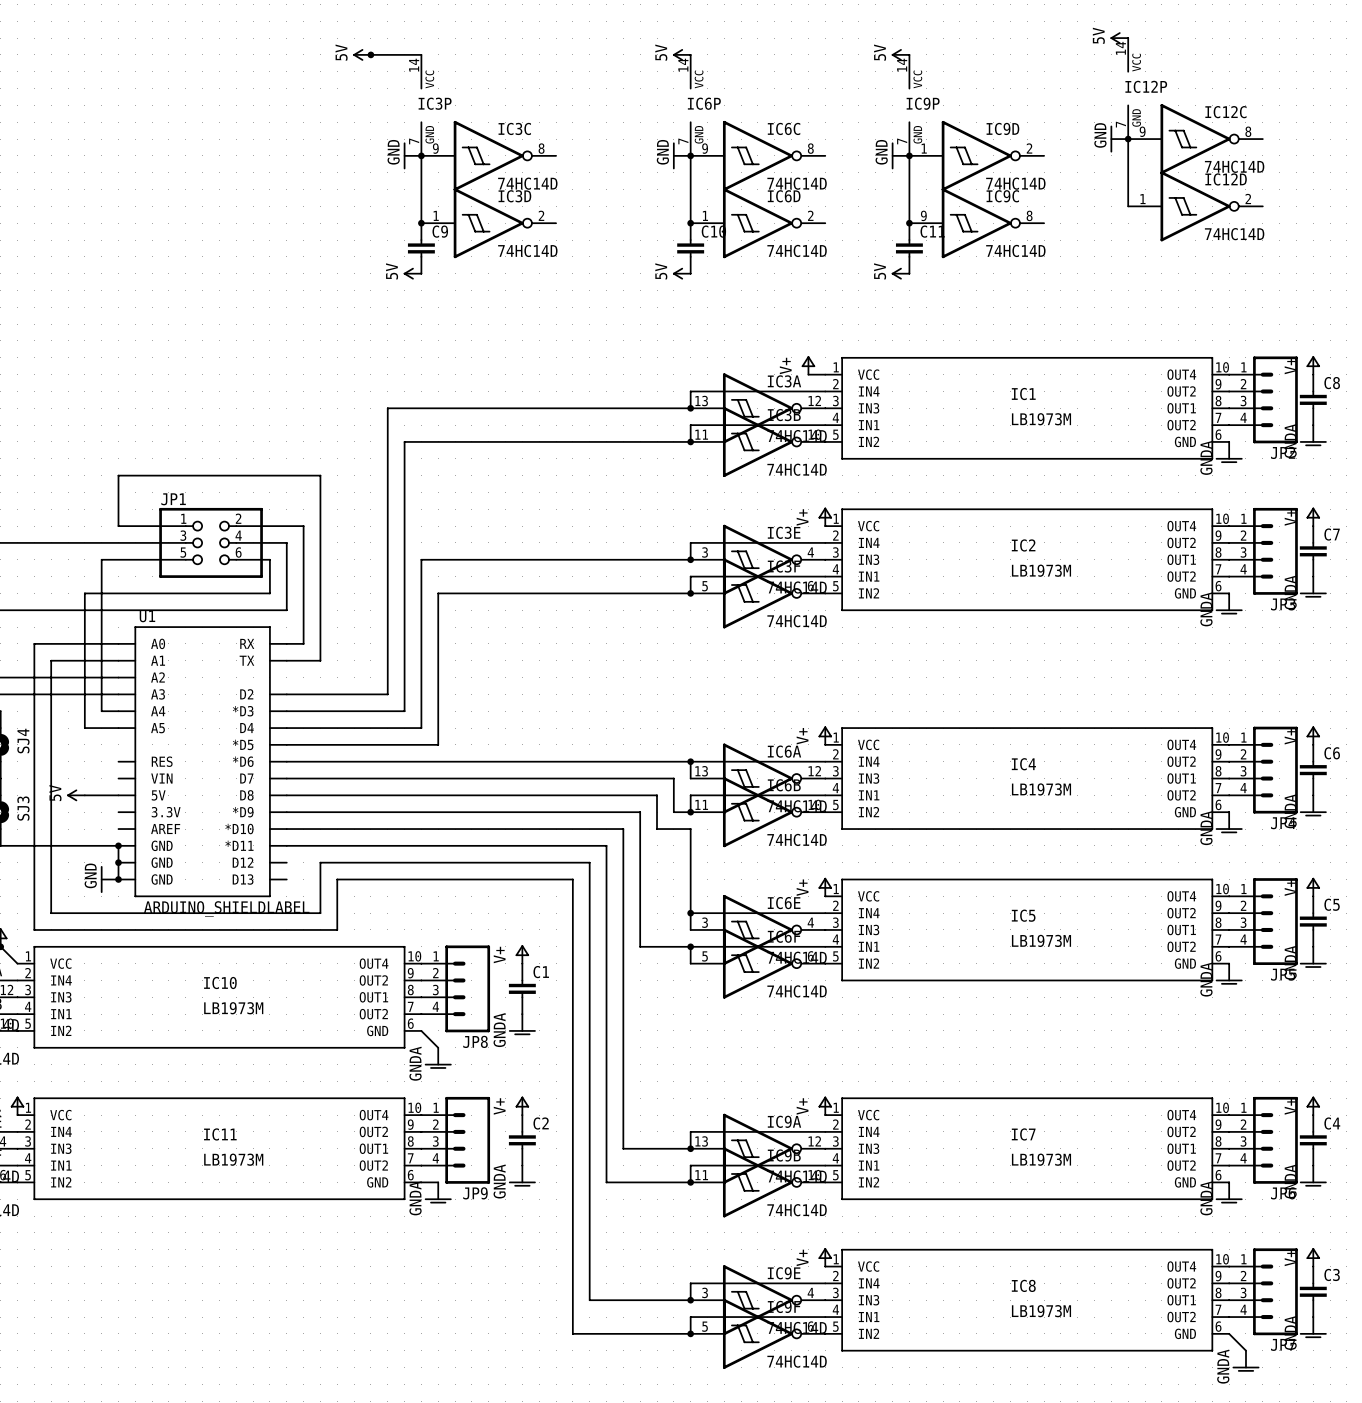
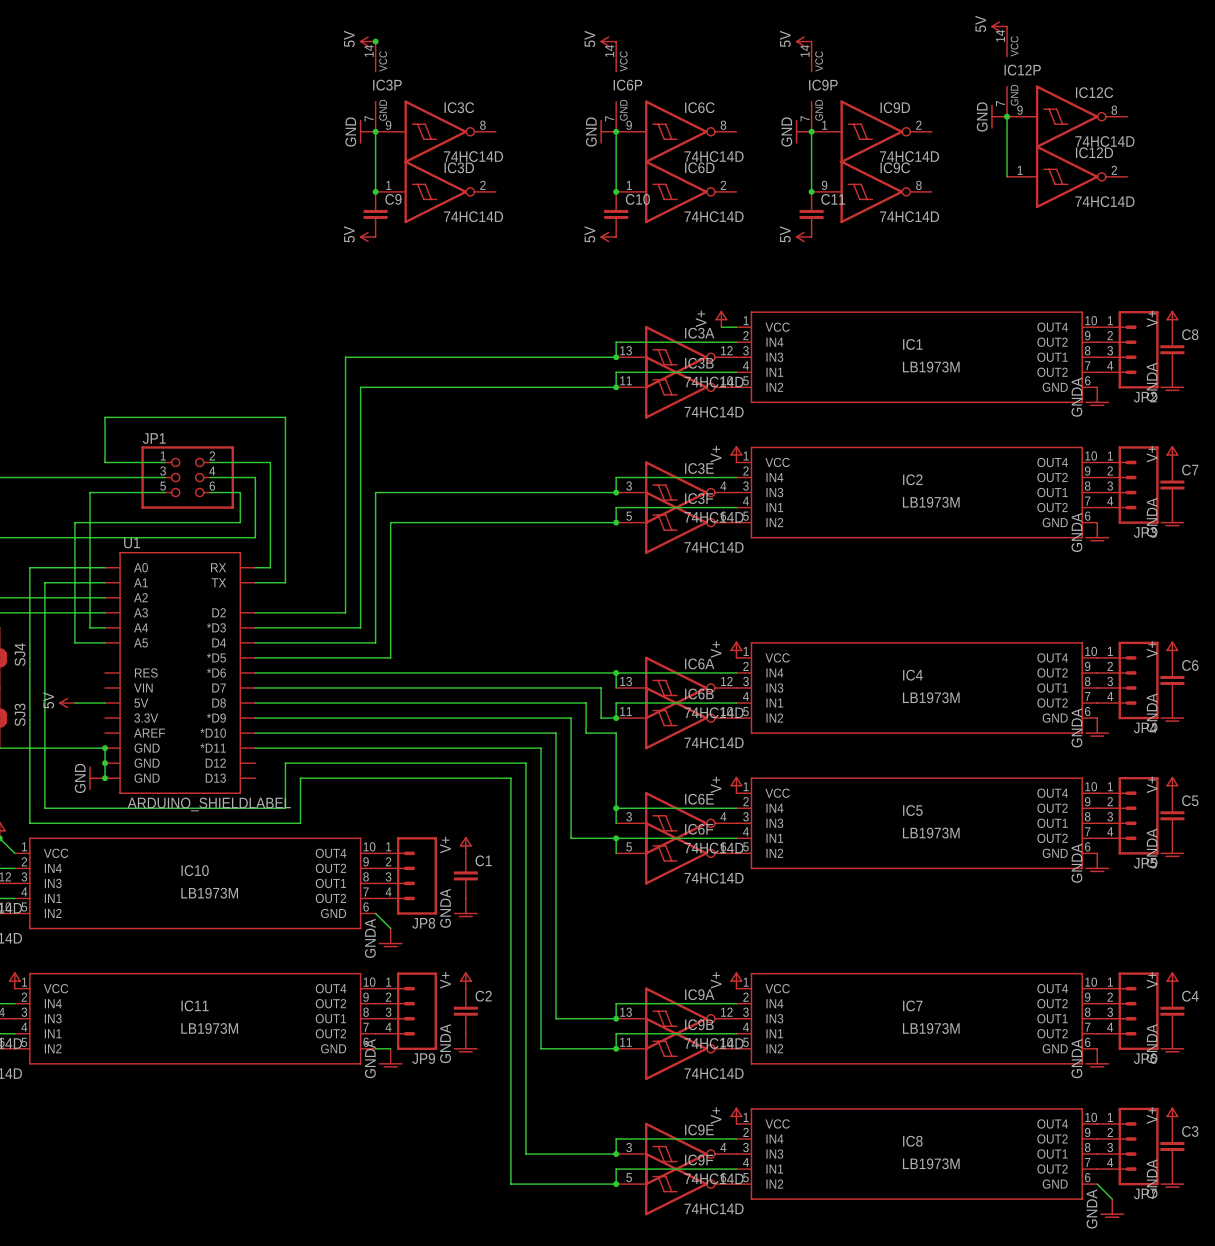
power symbol position: 5V (362, 54) -> 5V (367, 41)
wire: (370, 54) (421, 54) -> none
junction: (370, 54) -> none
junction: none -> (375, 41)

